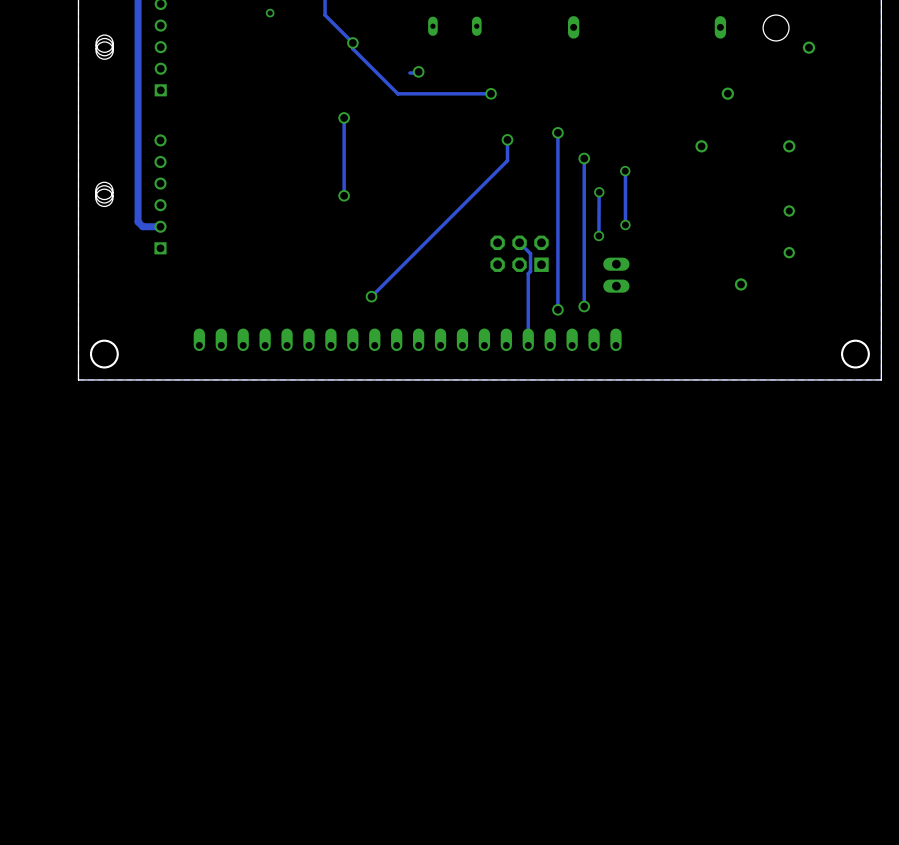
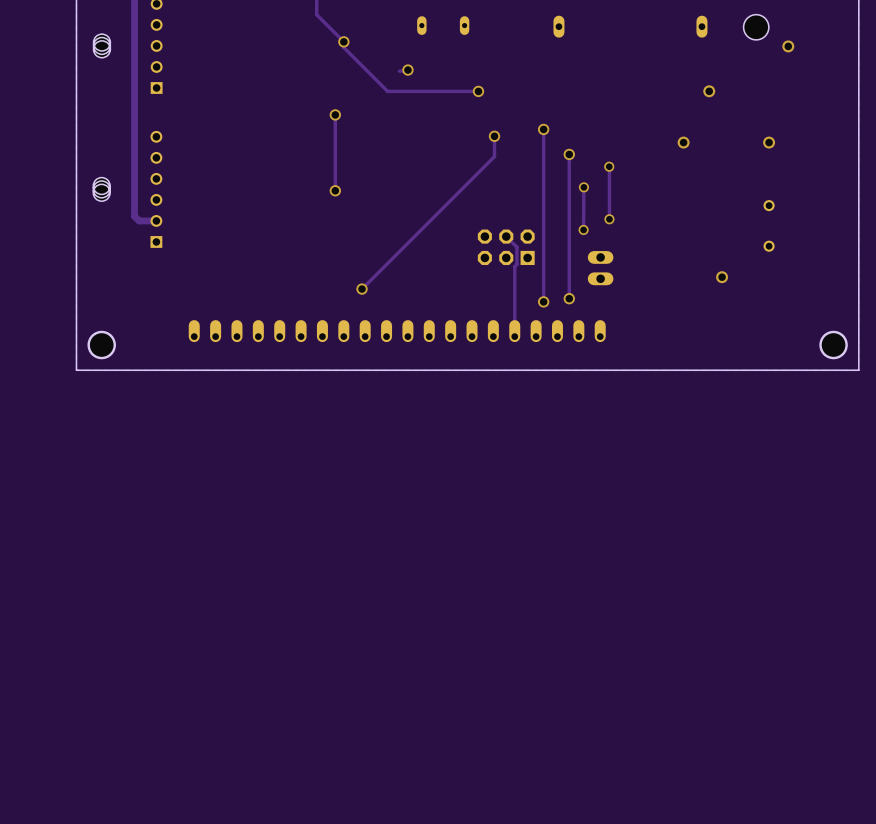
via: (270, 13) -> none

